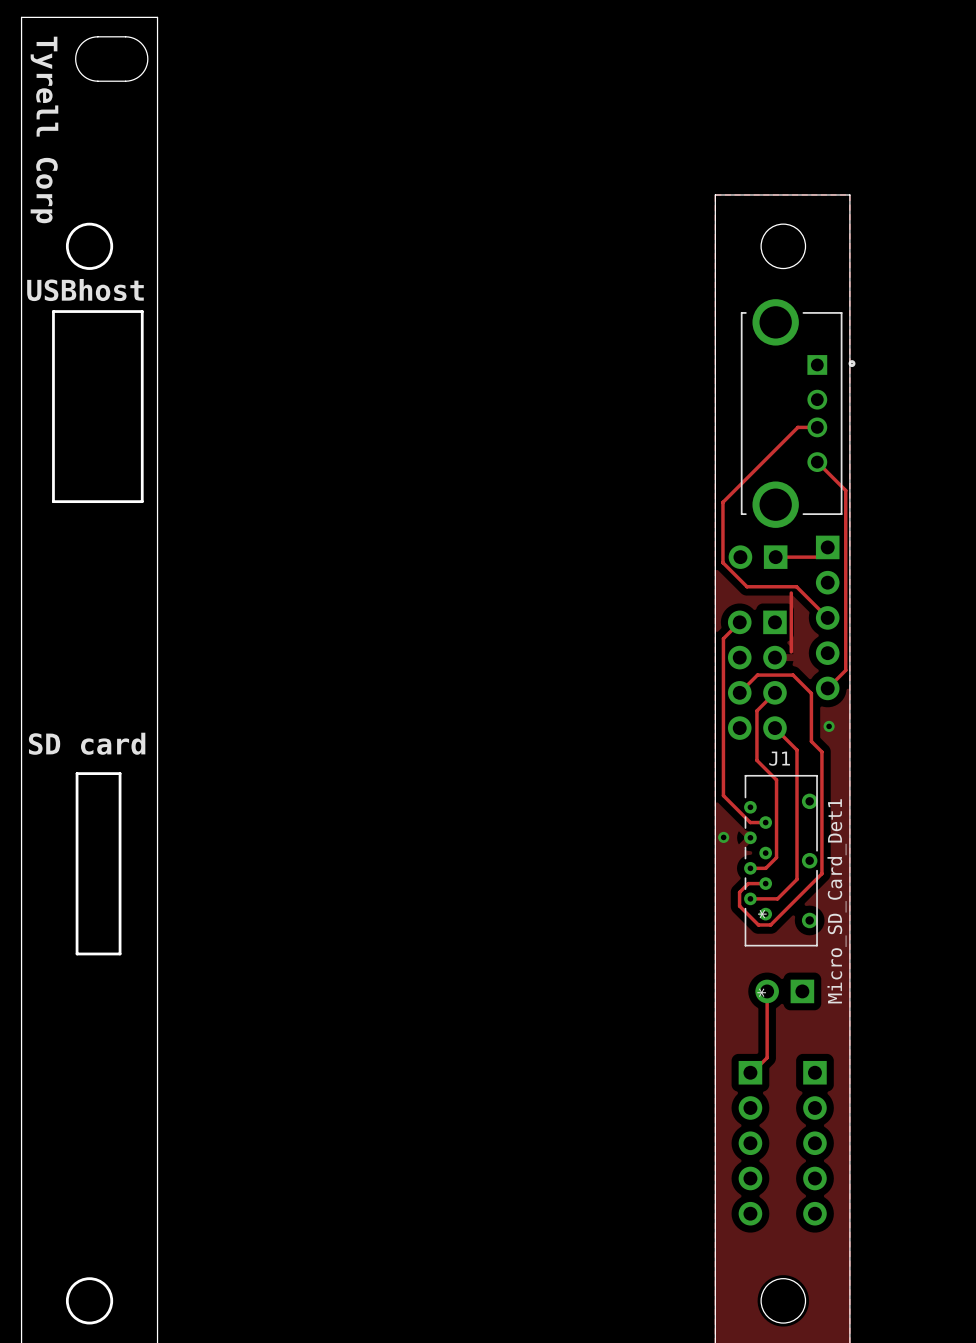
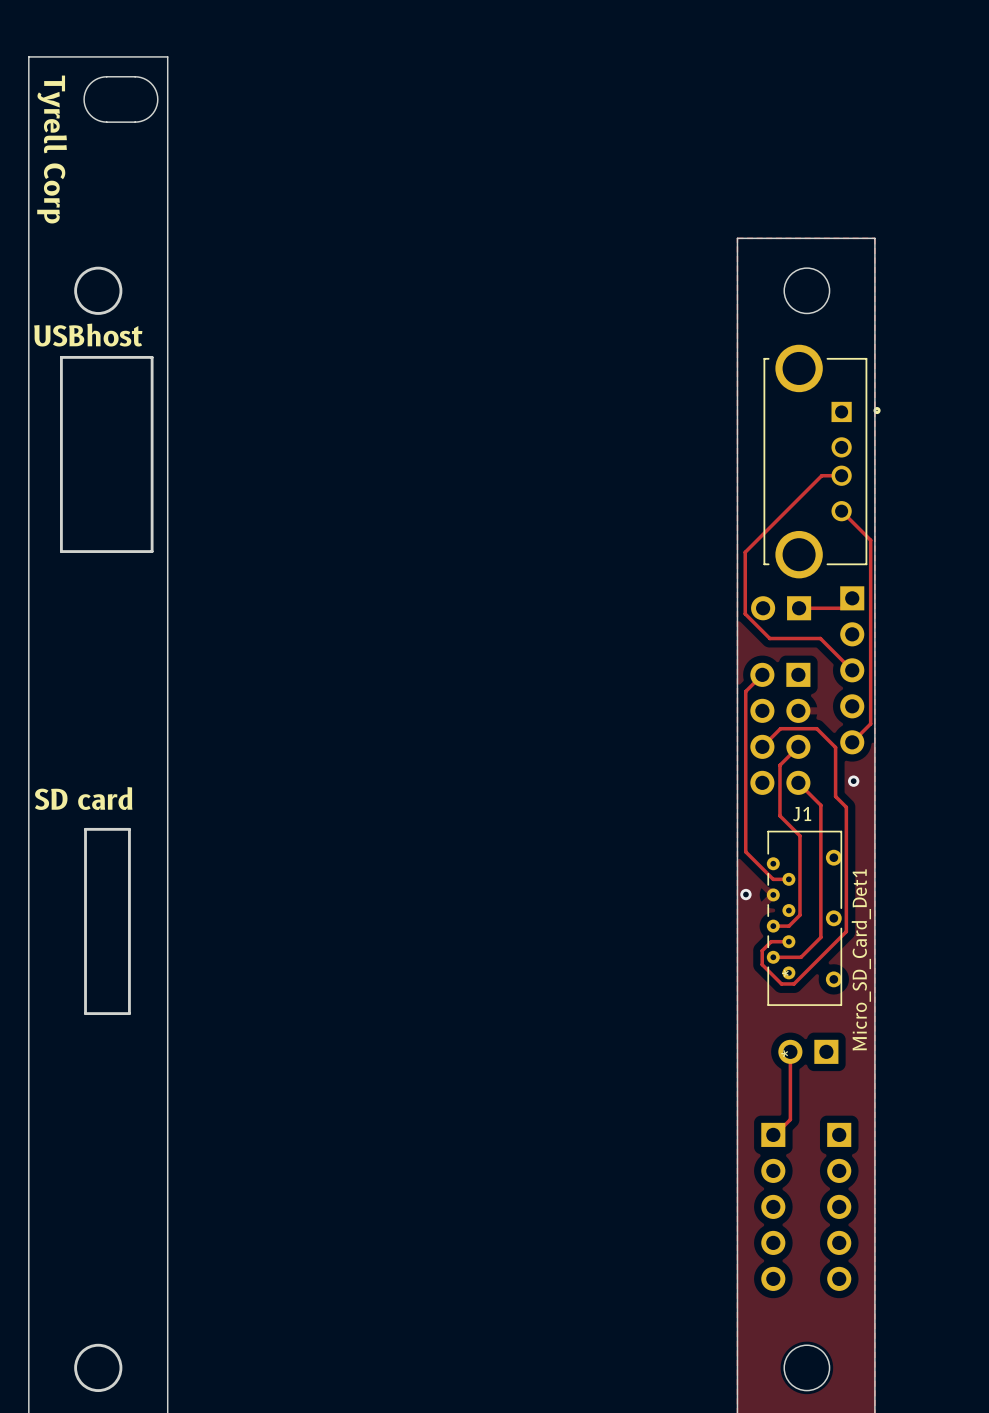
track: (791, 593) (791, 651) -> none

